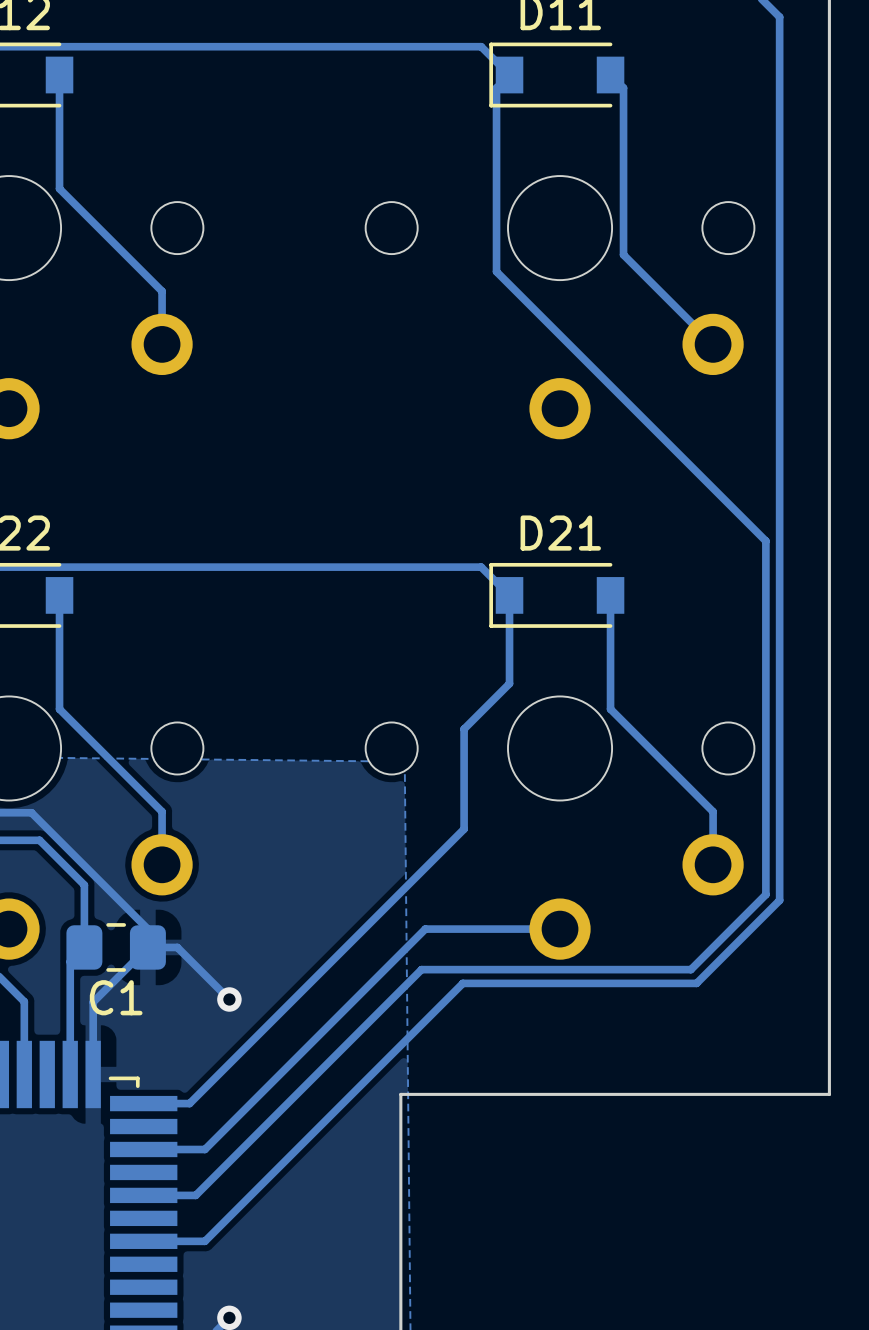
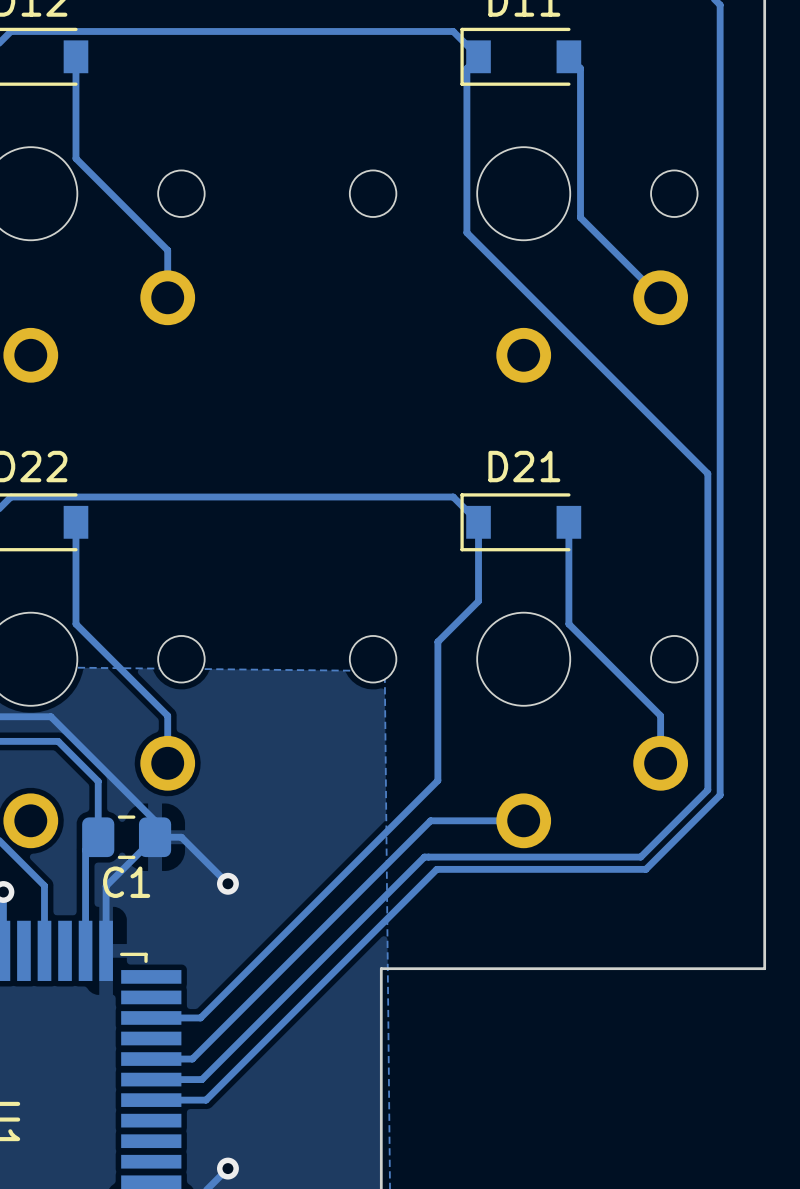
track: (464, 829) (189, 1103) (143, 1103) -> (437, 731) (437, 780) (200, 1017)
track: (455, 929) (425, 929) (204, 1149) (198, 1149) -> none
track: (449, 969) (421, 969) (195, 1195) (189, 1195) -> (430, 820) (192, 1059)
track: none -> (424, 857) (201, 1079) (151, 1079)

